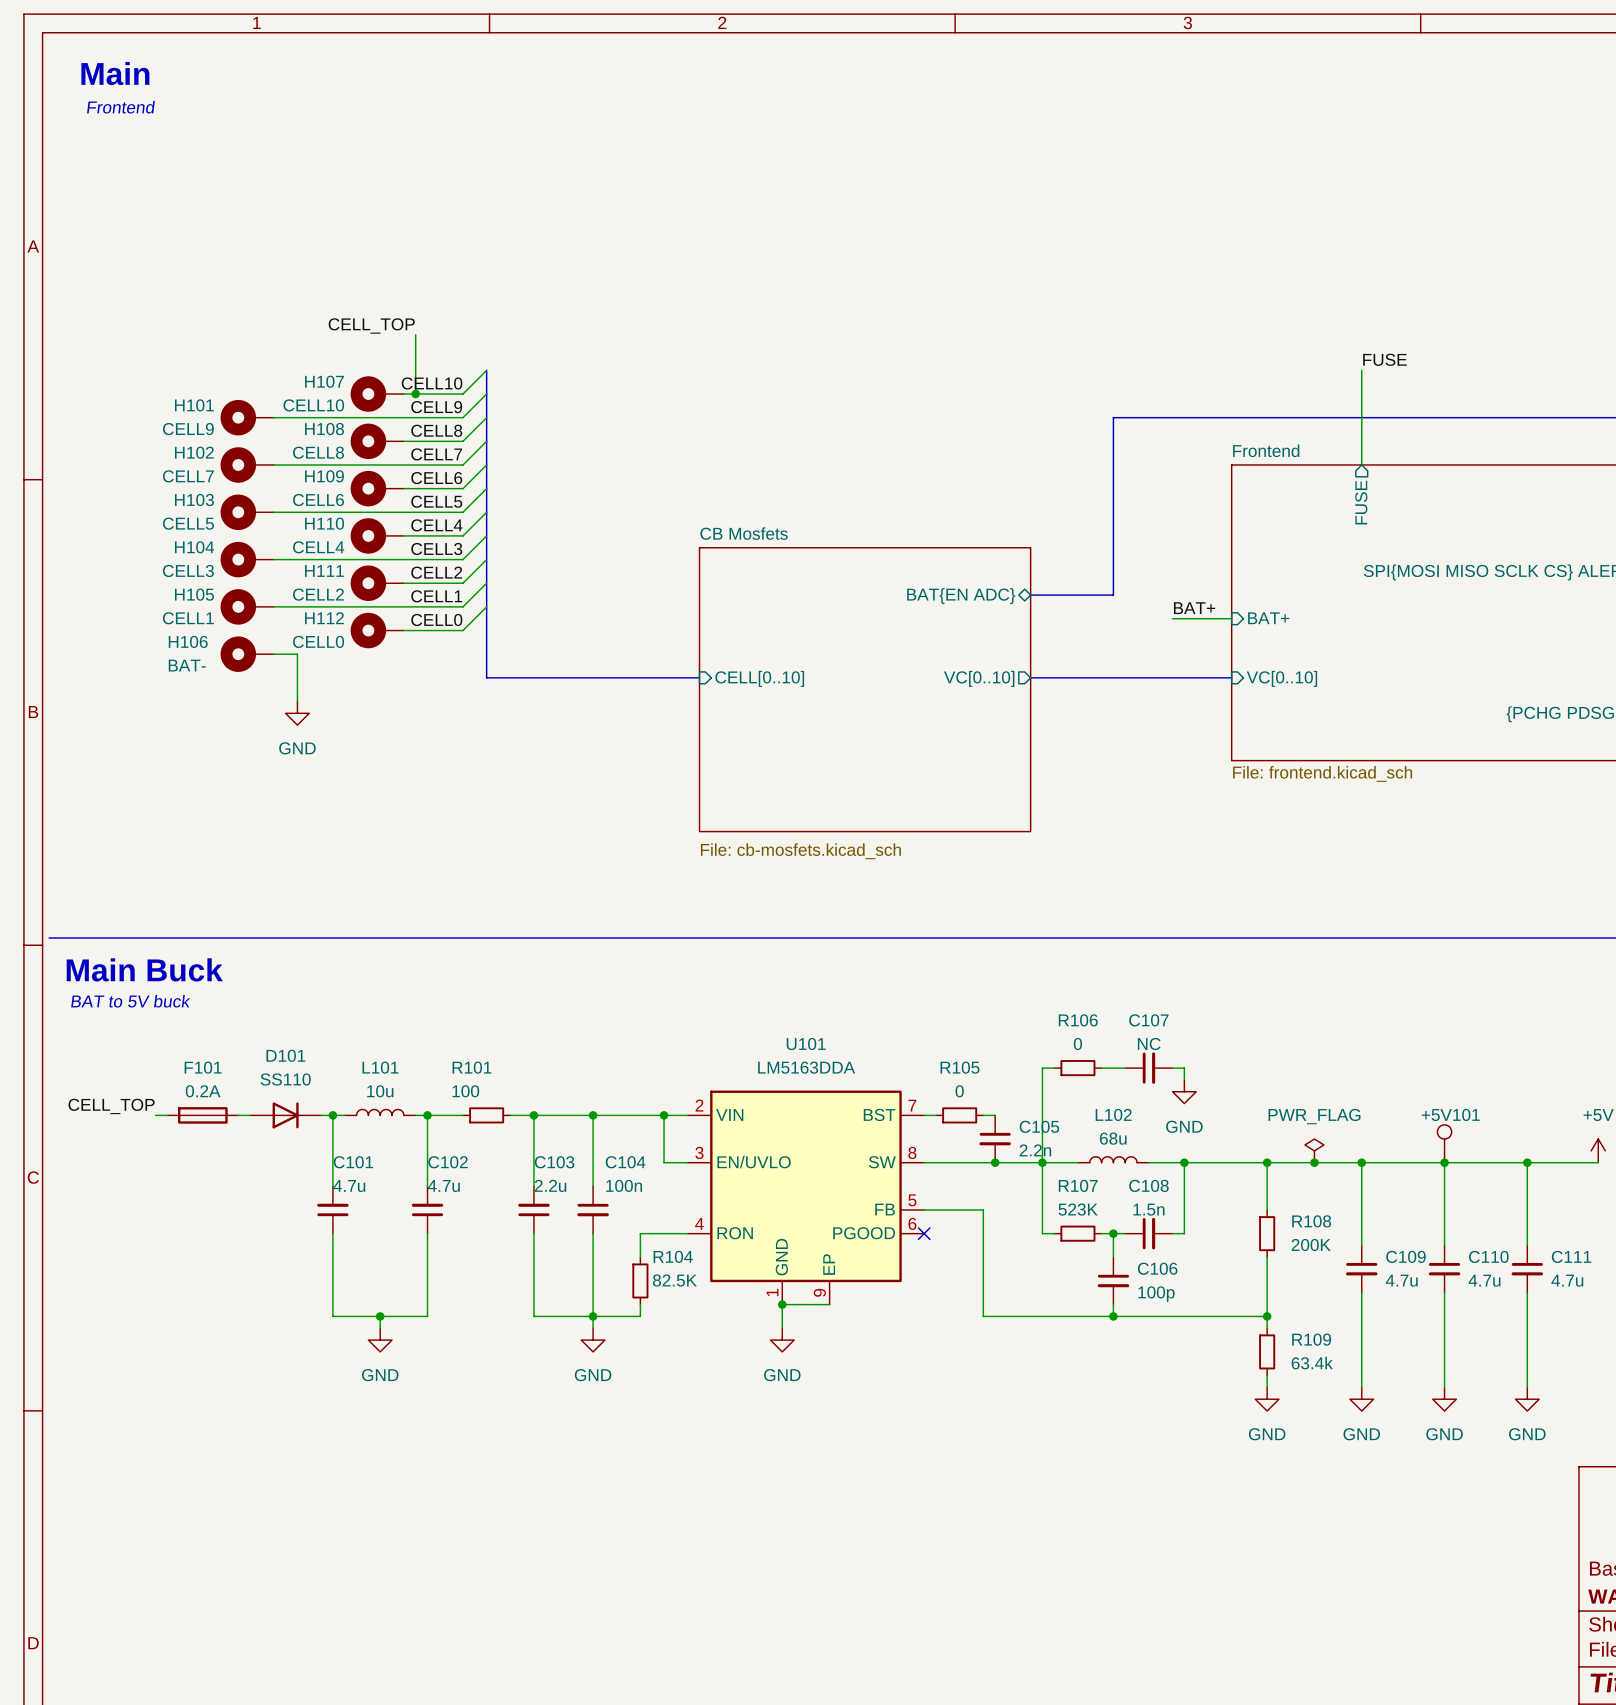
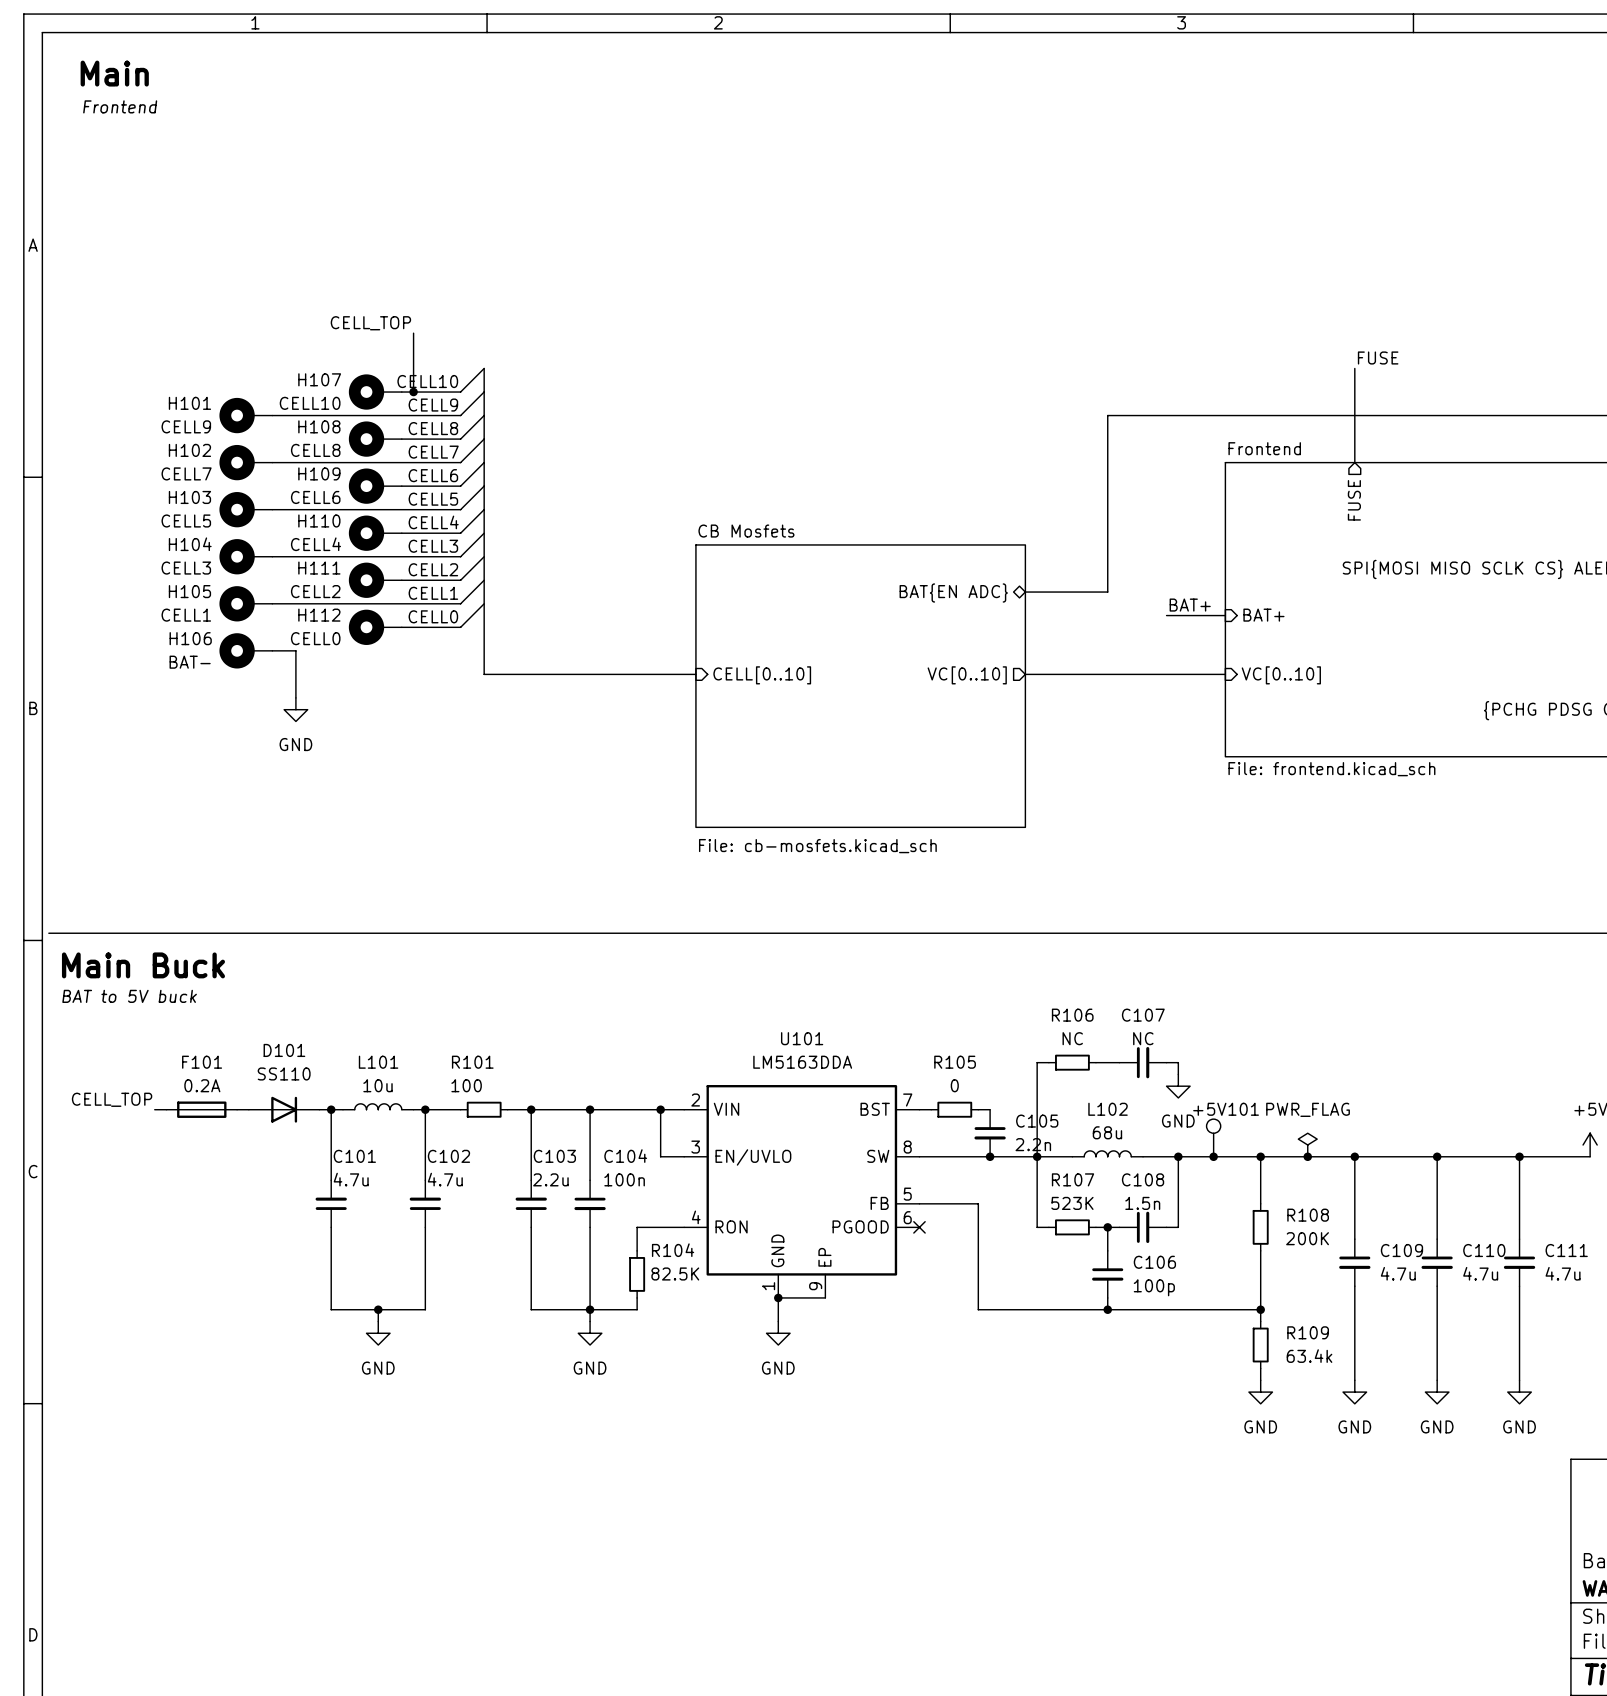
R106 value: 0 (1077, 1043) -> NC (1072, 1038)
+5V101 position: (1444, 1143) -> (1213, 1137)
junction: none -> (1213, 1156)

